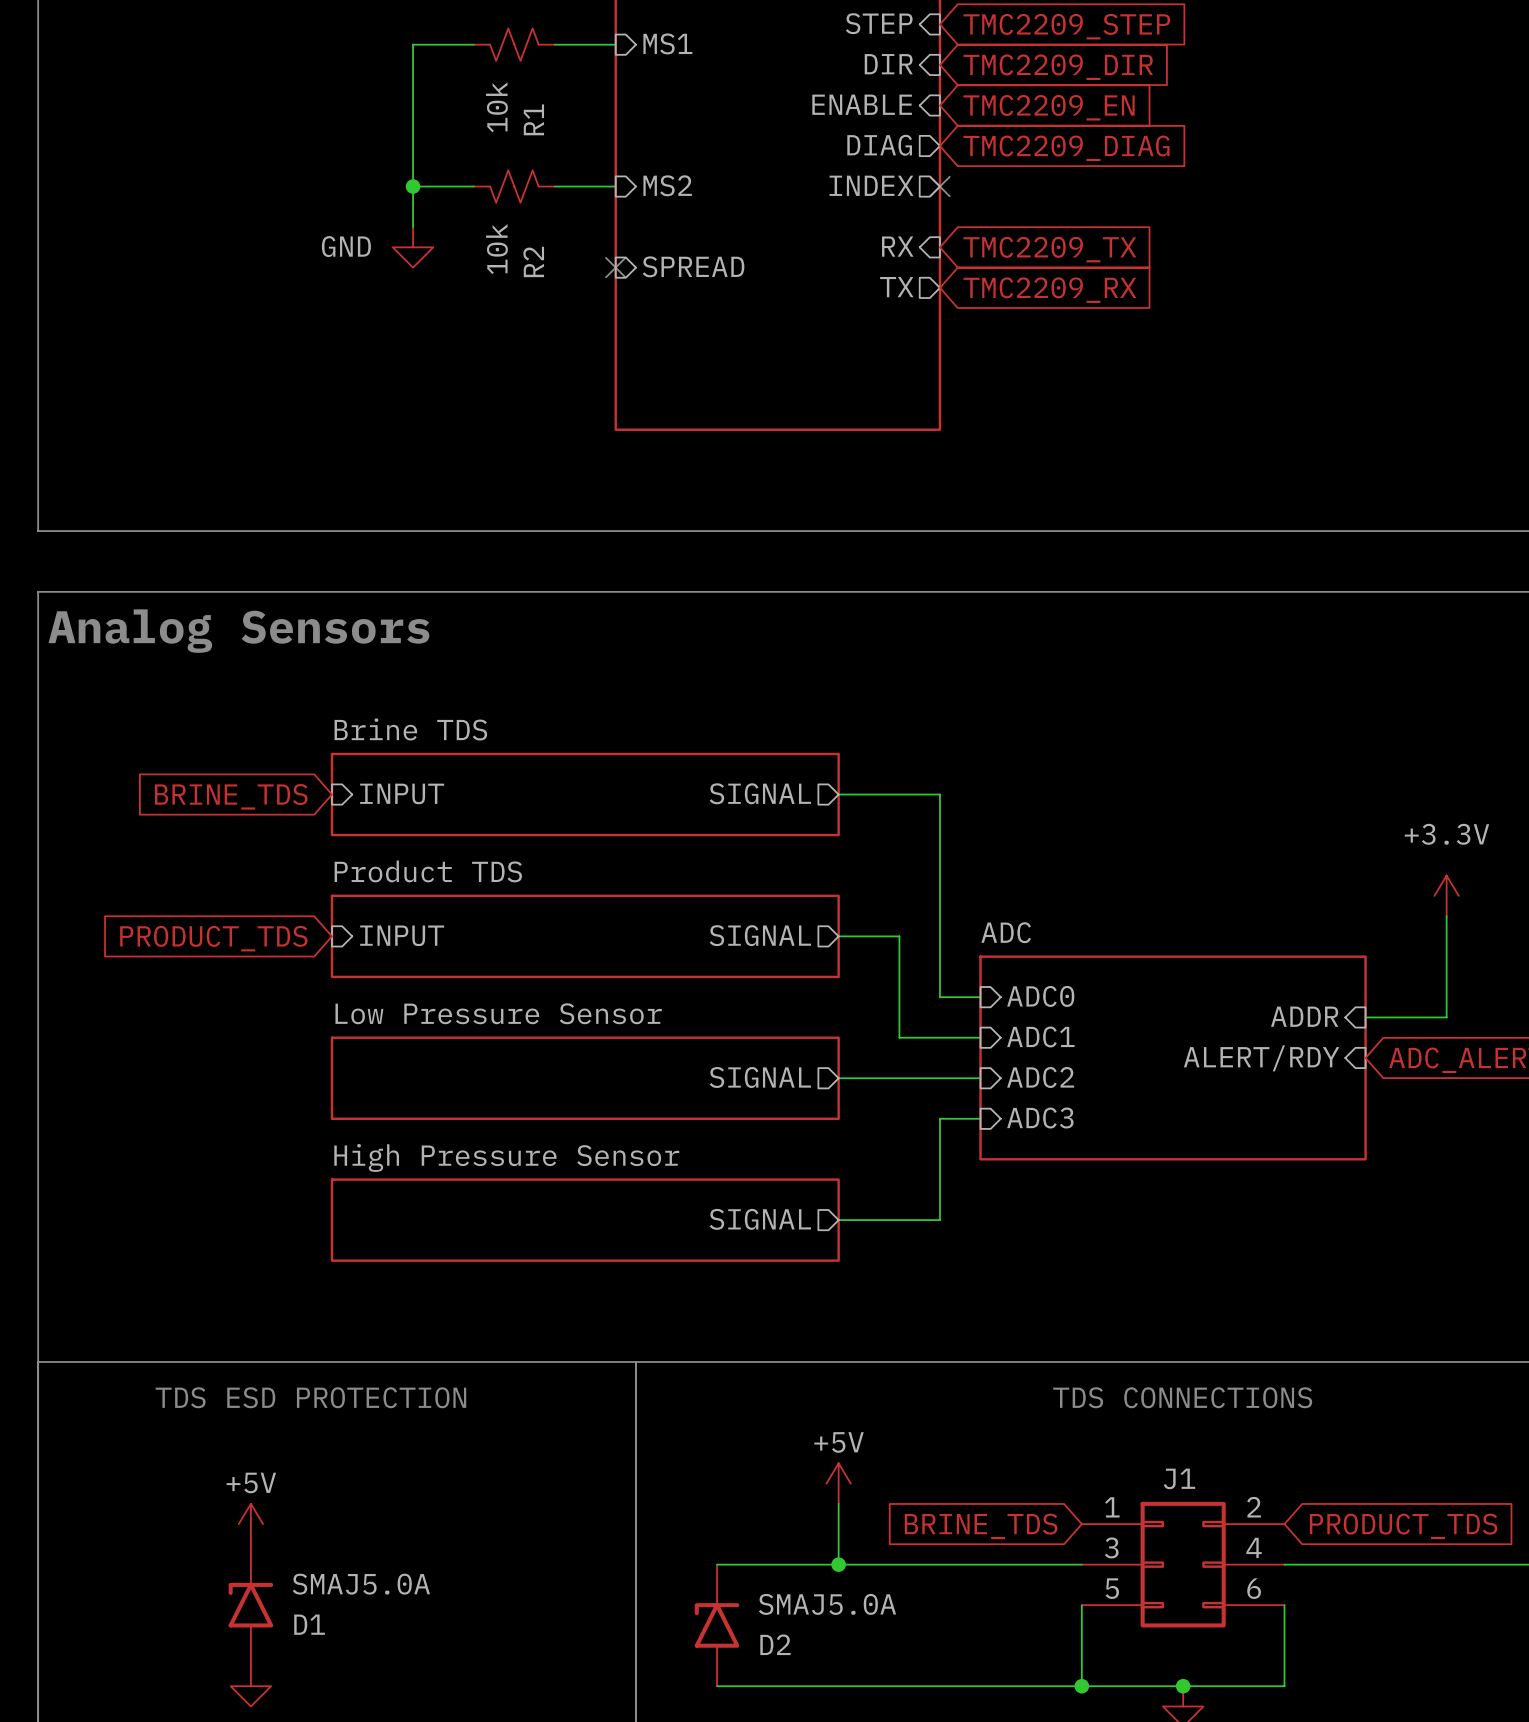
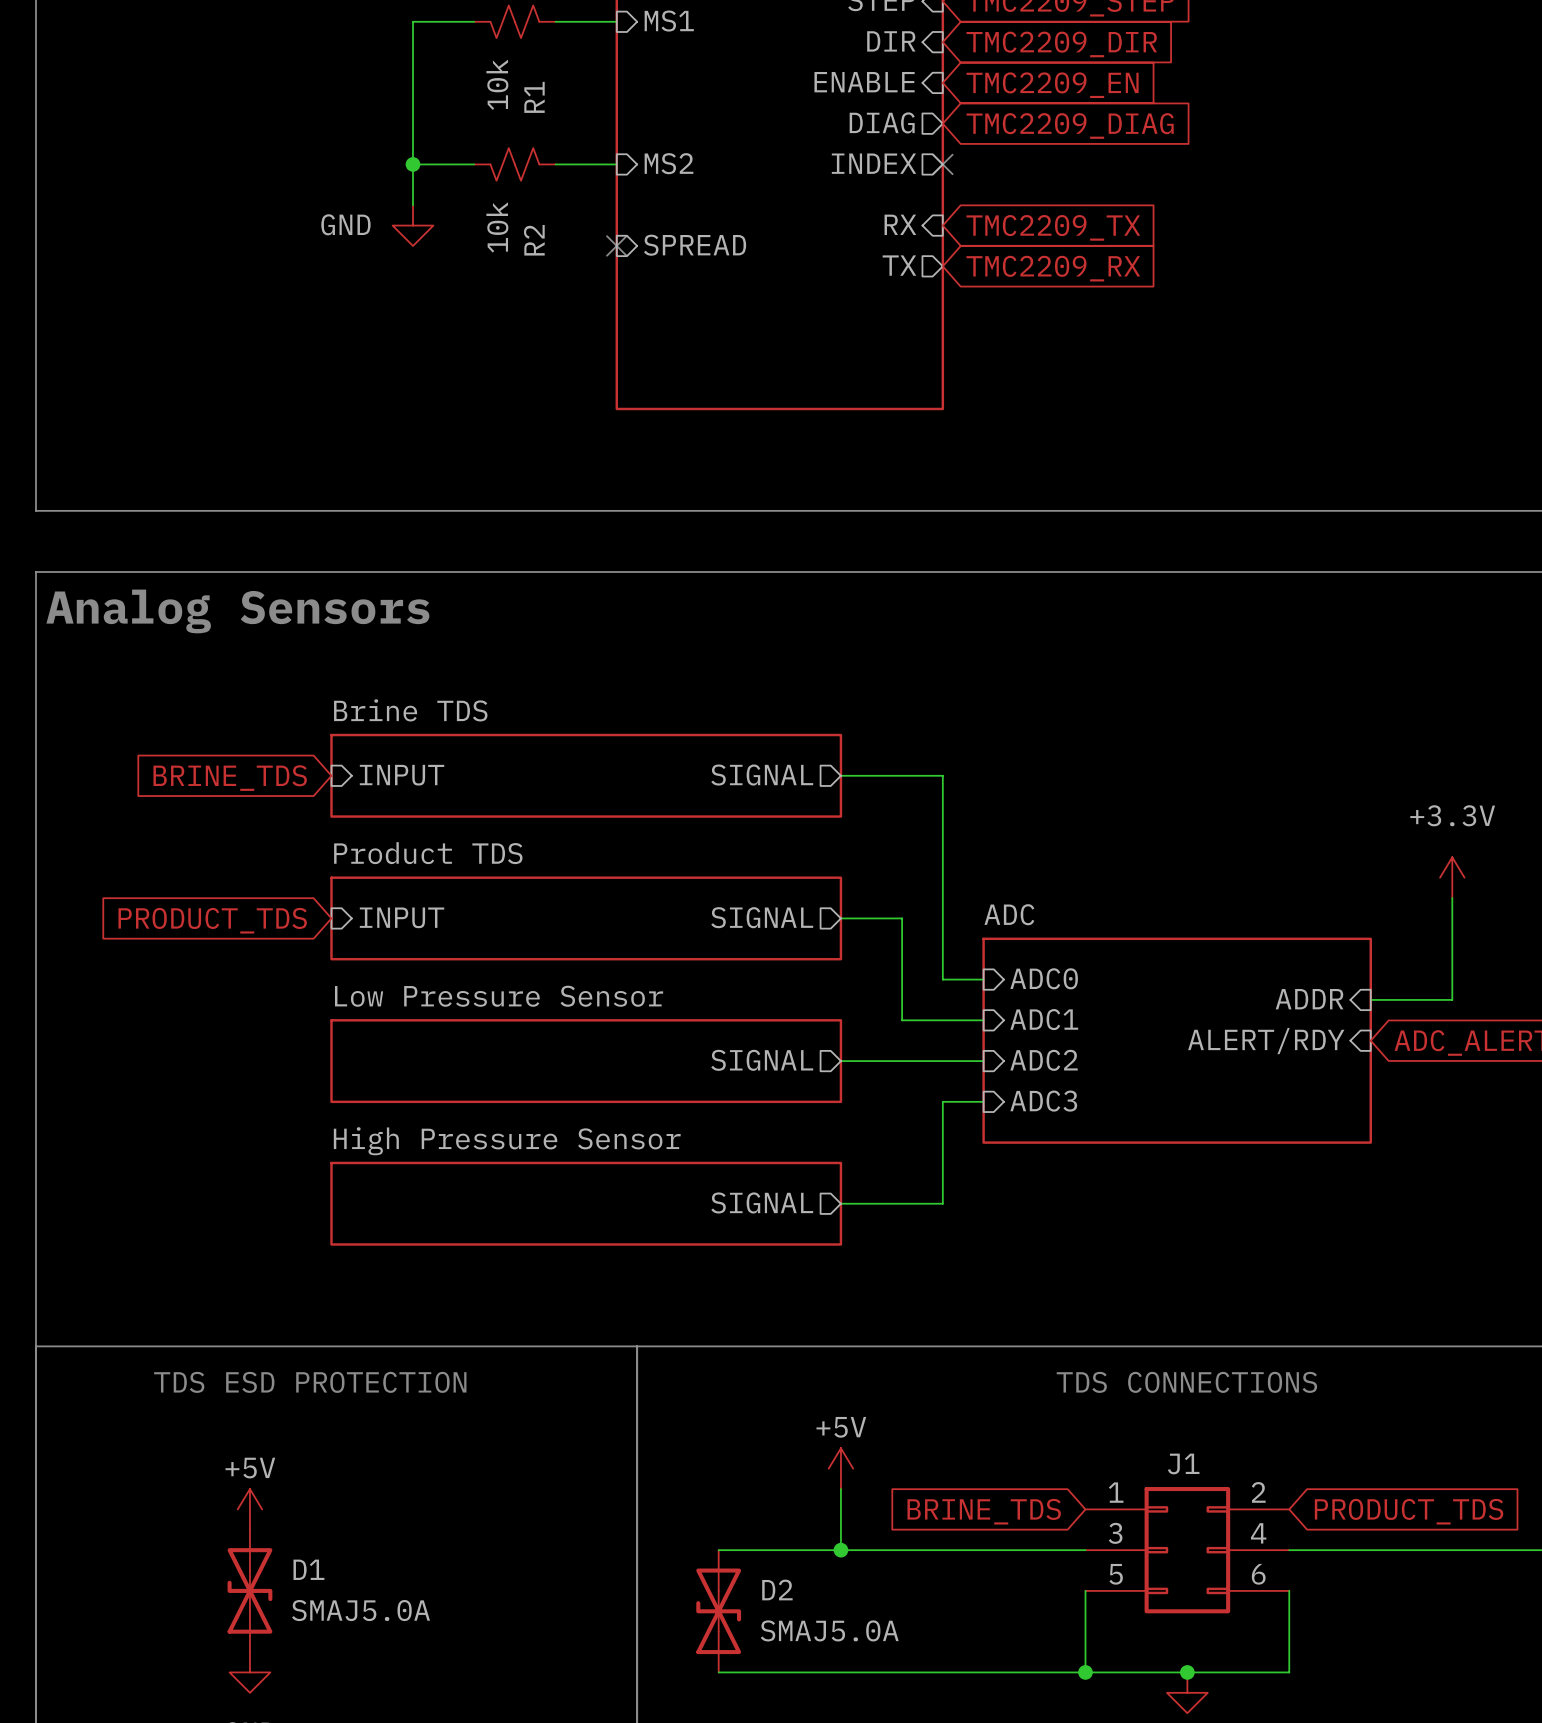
D1 symbol: [228, 1544, 274, 1666] -> [227, 1529, 273, 1653]
D2 symbol: [694, 1564, 740, 1687] -> [696, 1550, 742, 1673]
D1 value position: SMAJ5.0A (361, 1584) -> SMAJ5.0A (361, 1610)
D2 value position: SMAJ5.0A (827, 1604) -> SMAJ5.0A (829, 1630)
D1 name position: D1 (309, 1624) -> D1 (308, 1569)
D2 name position: D2 (775, 1644) -> D2 (777, 1589)

